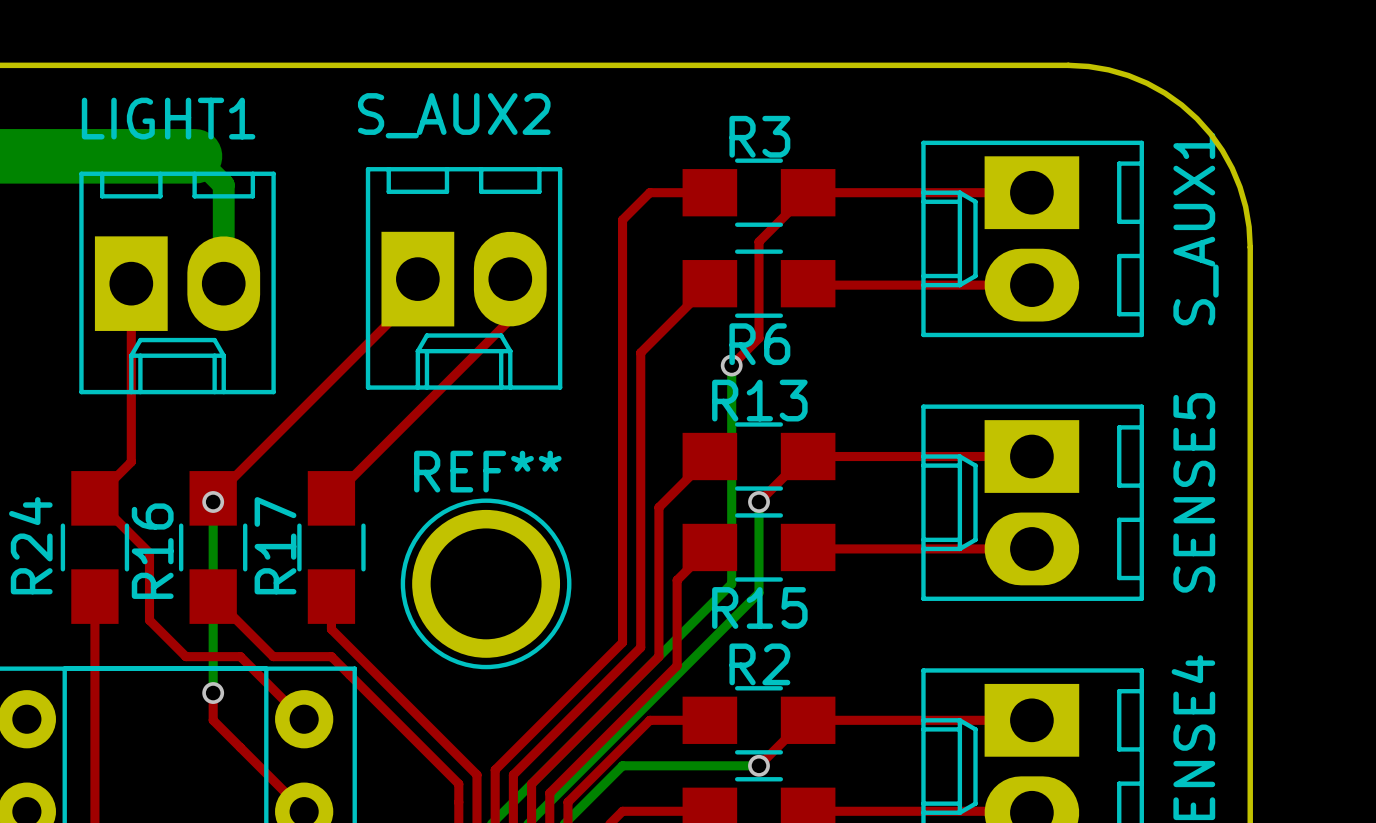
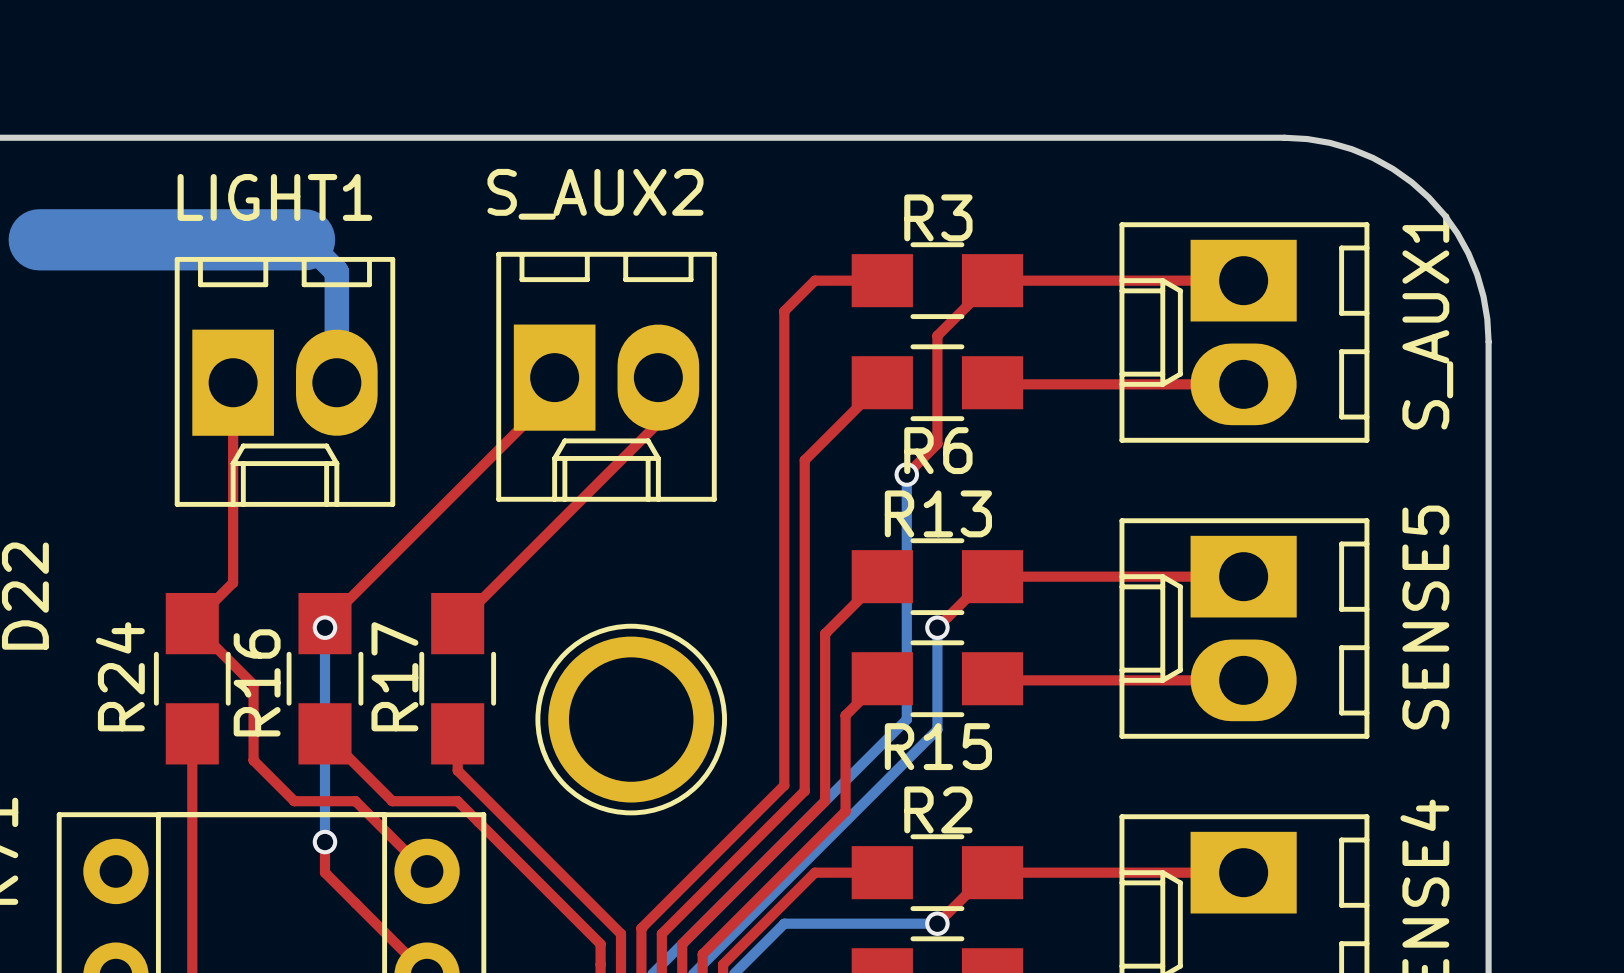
REF** name: REF** (487, 471) -> none

